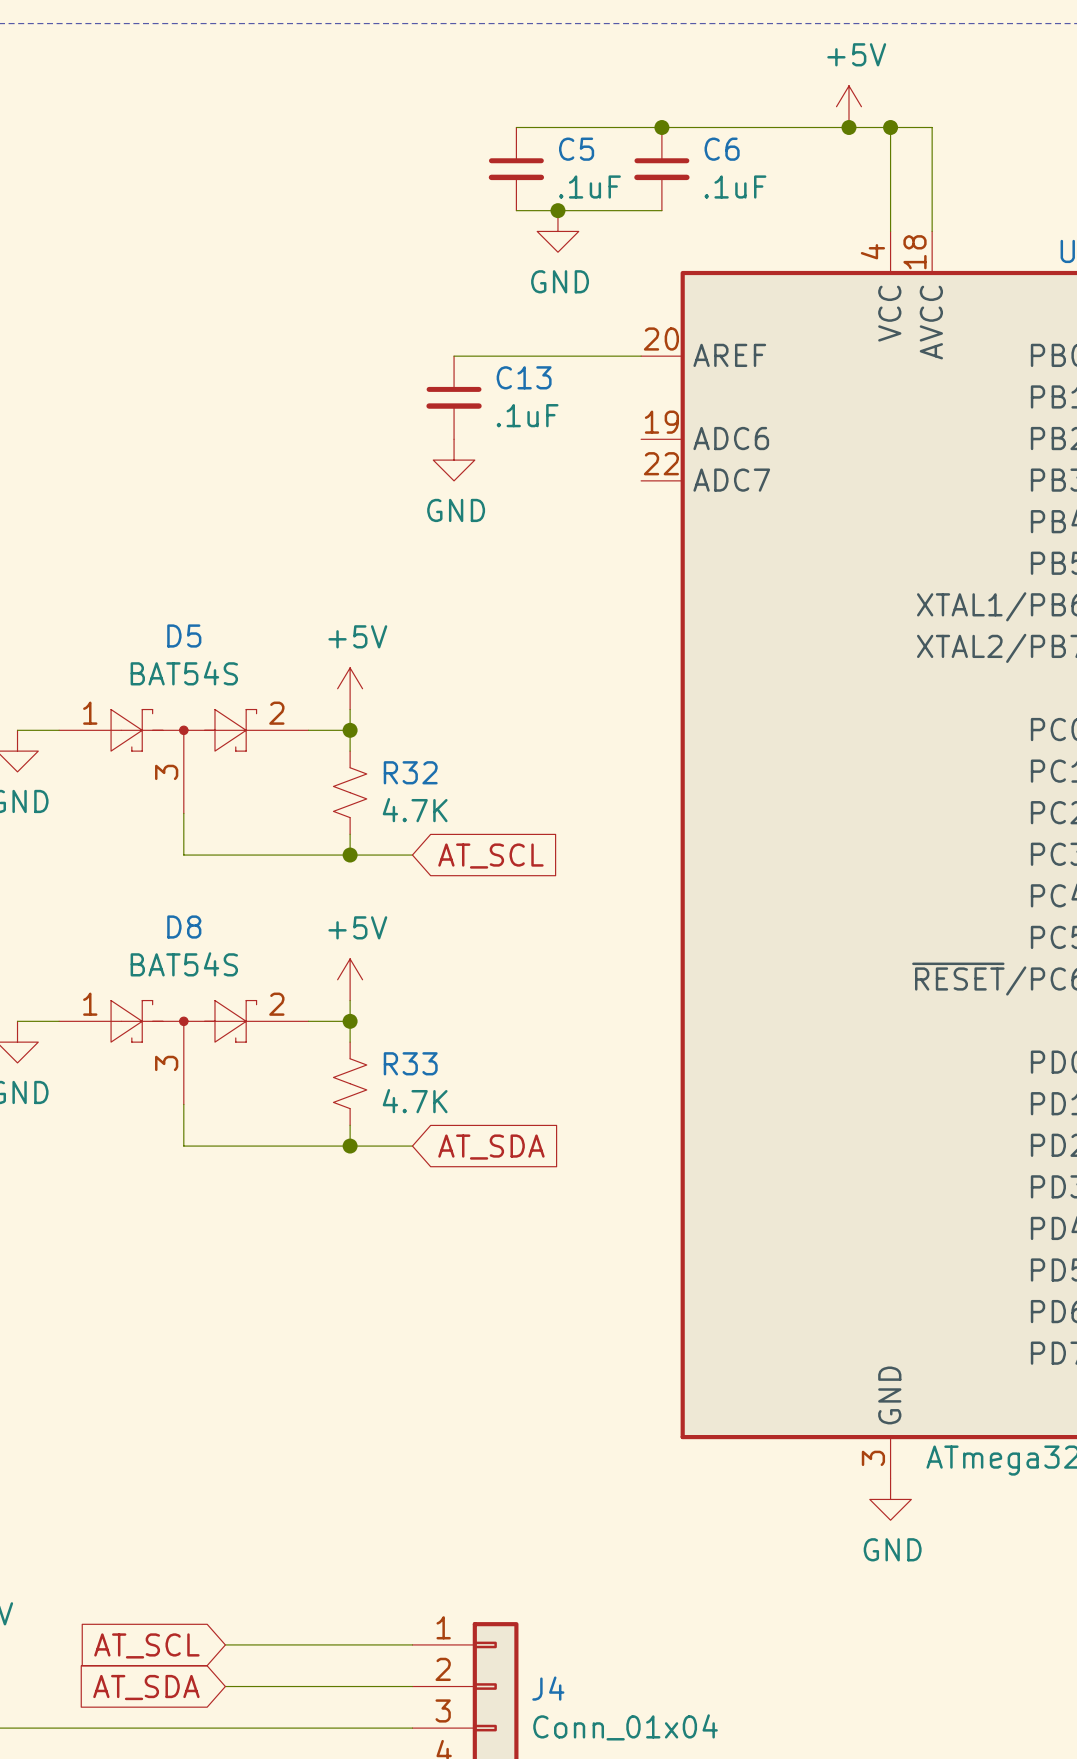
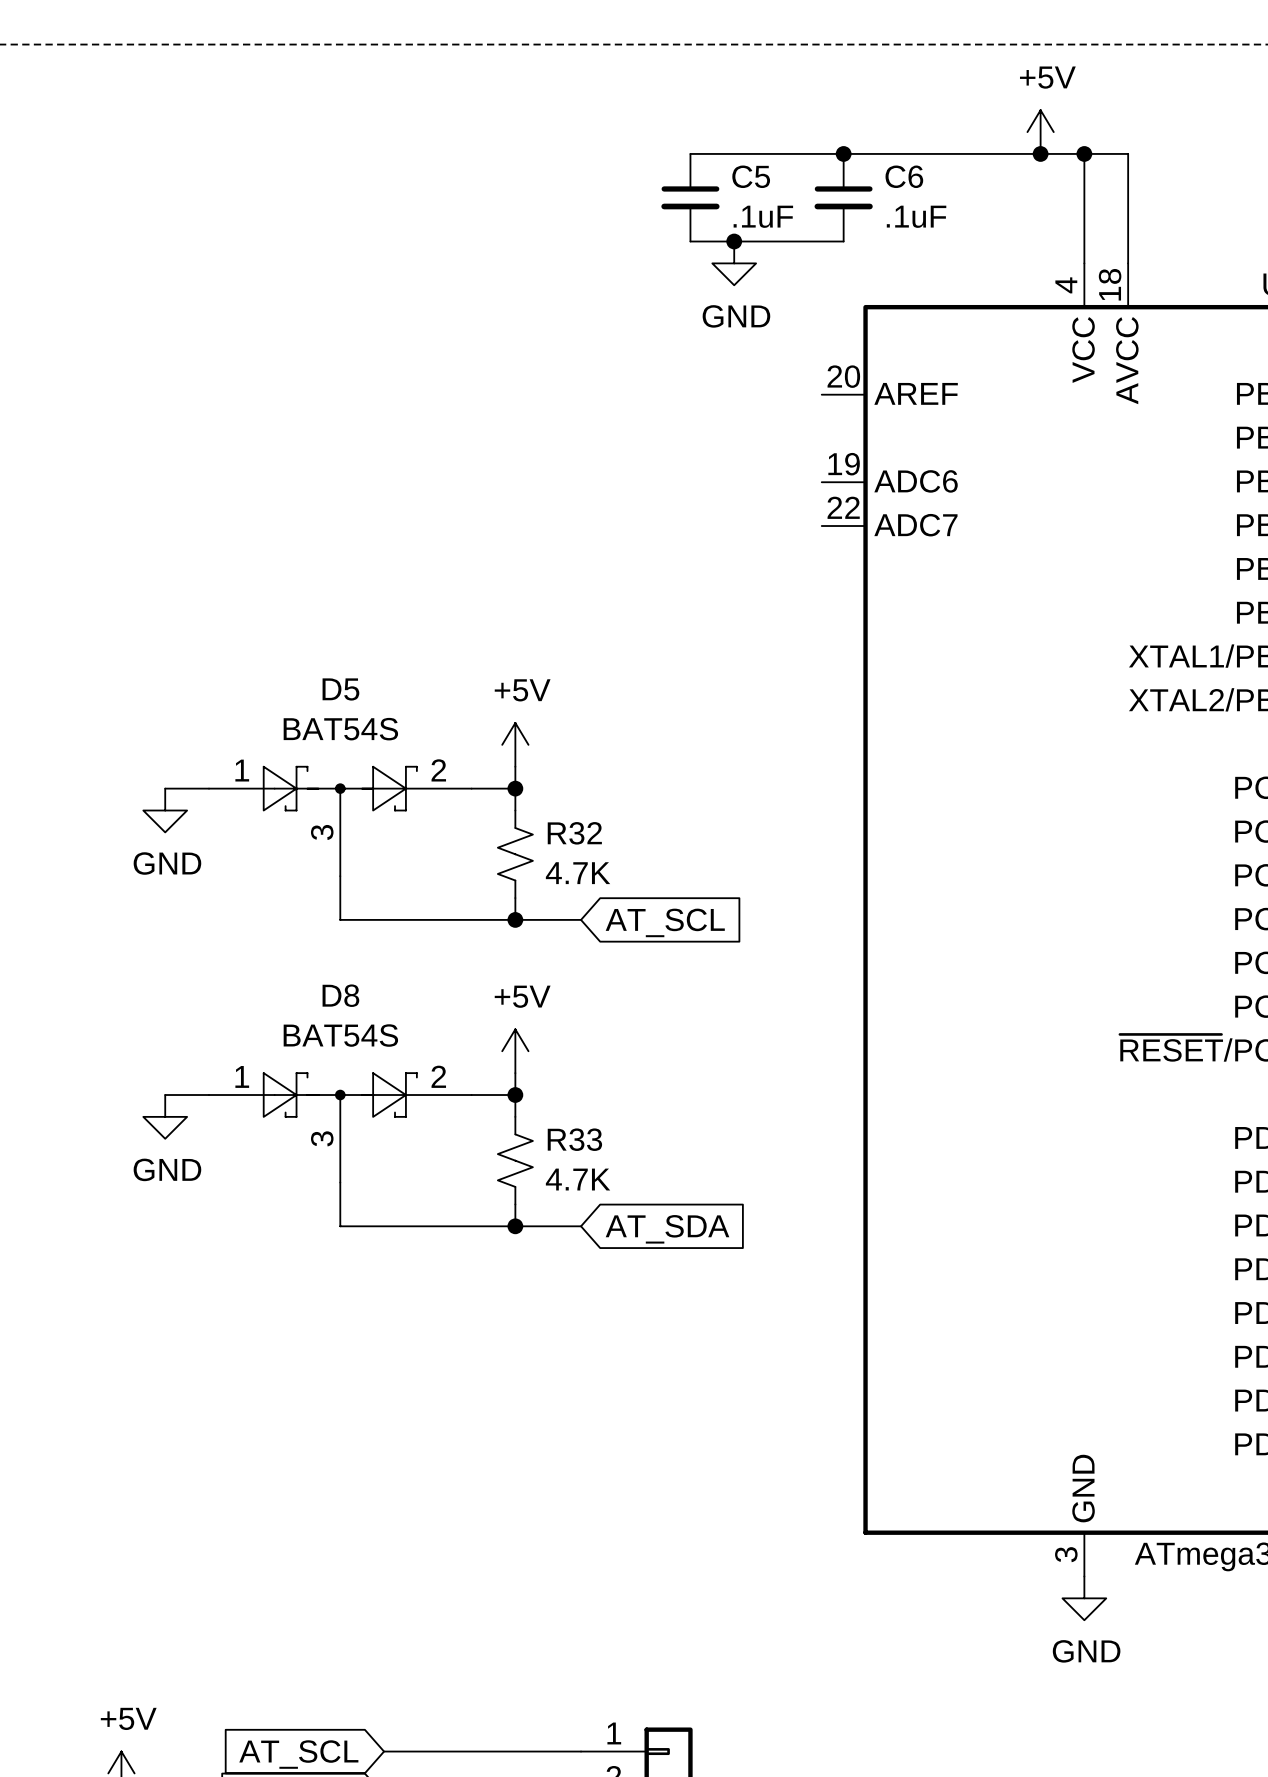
wire: (454, 356) (641, 356) -> none
C13: .1uF (454, 397) -> none
power symbol: GND (454, 460) -> none

